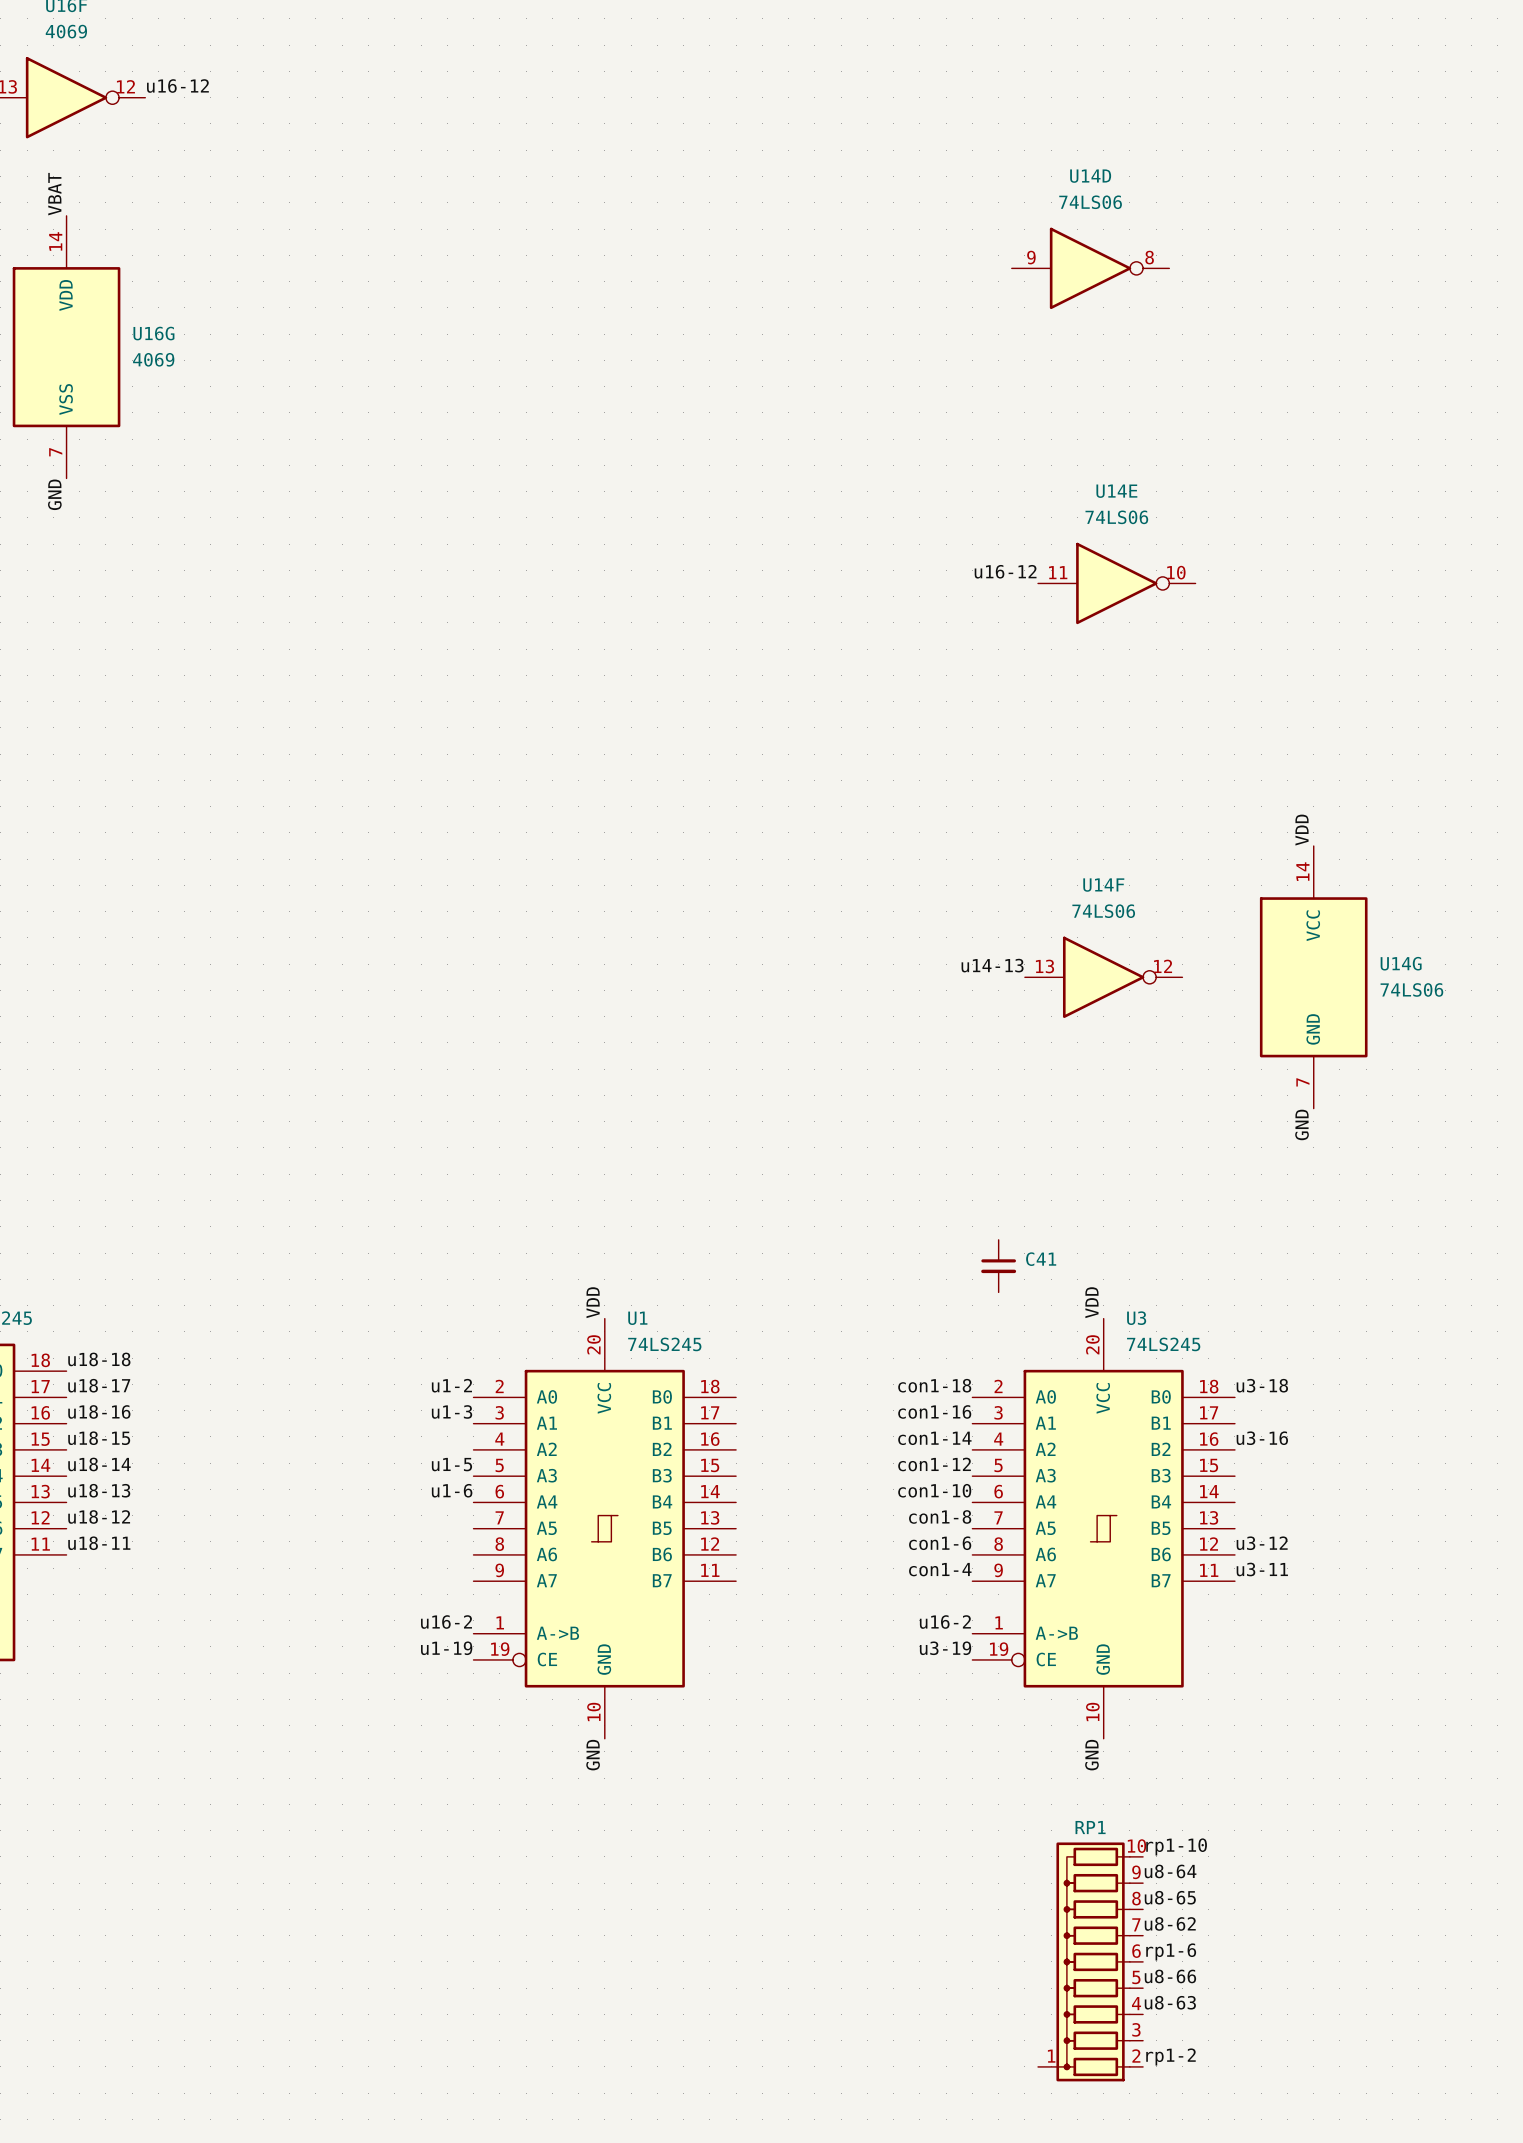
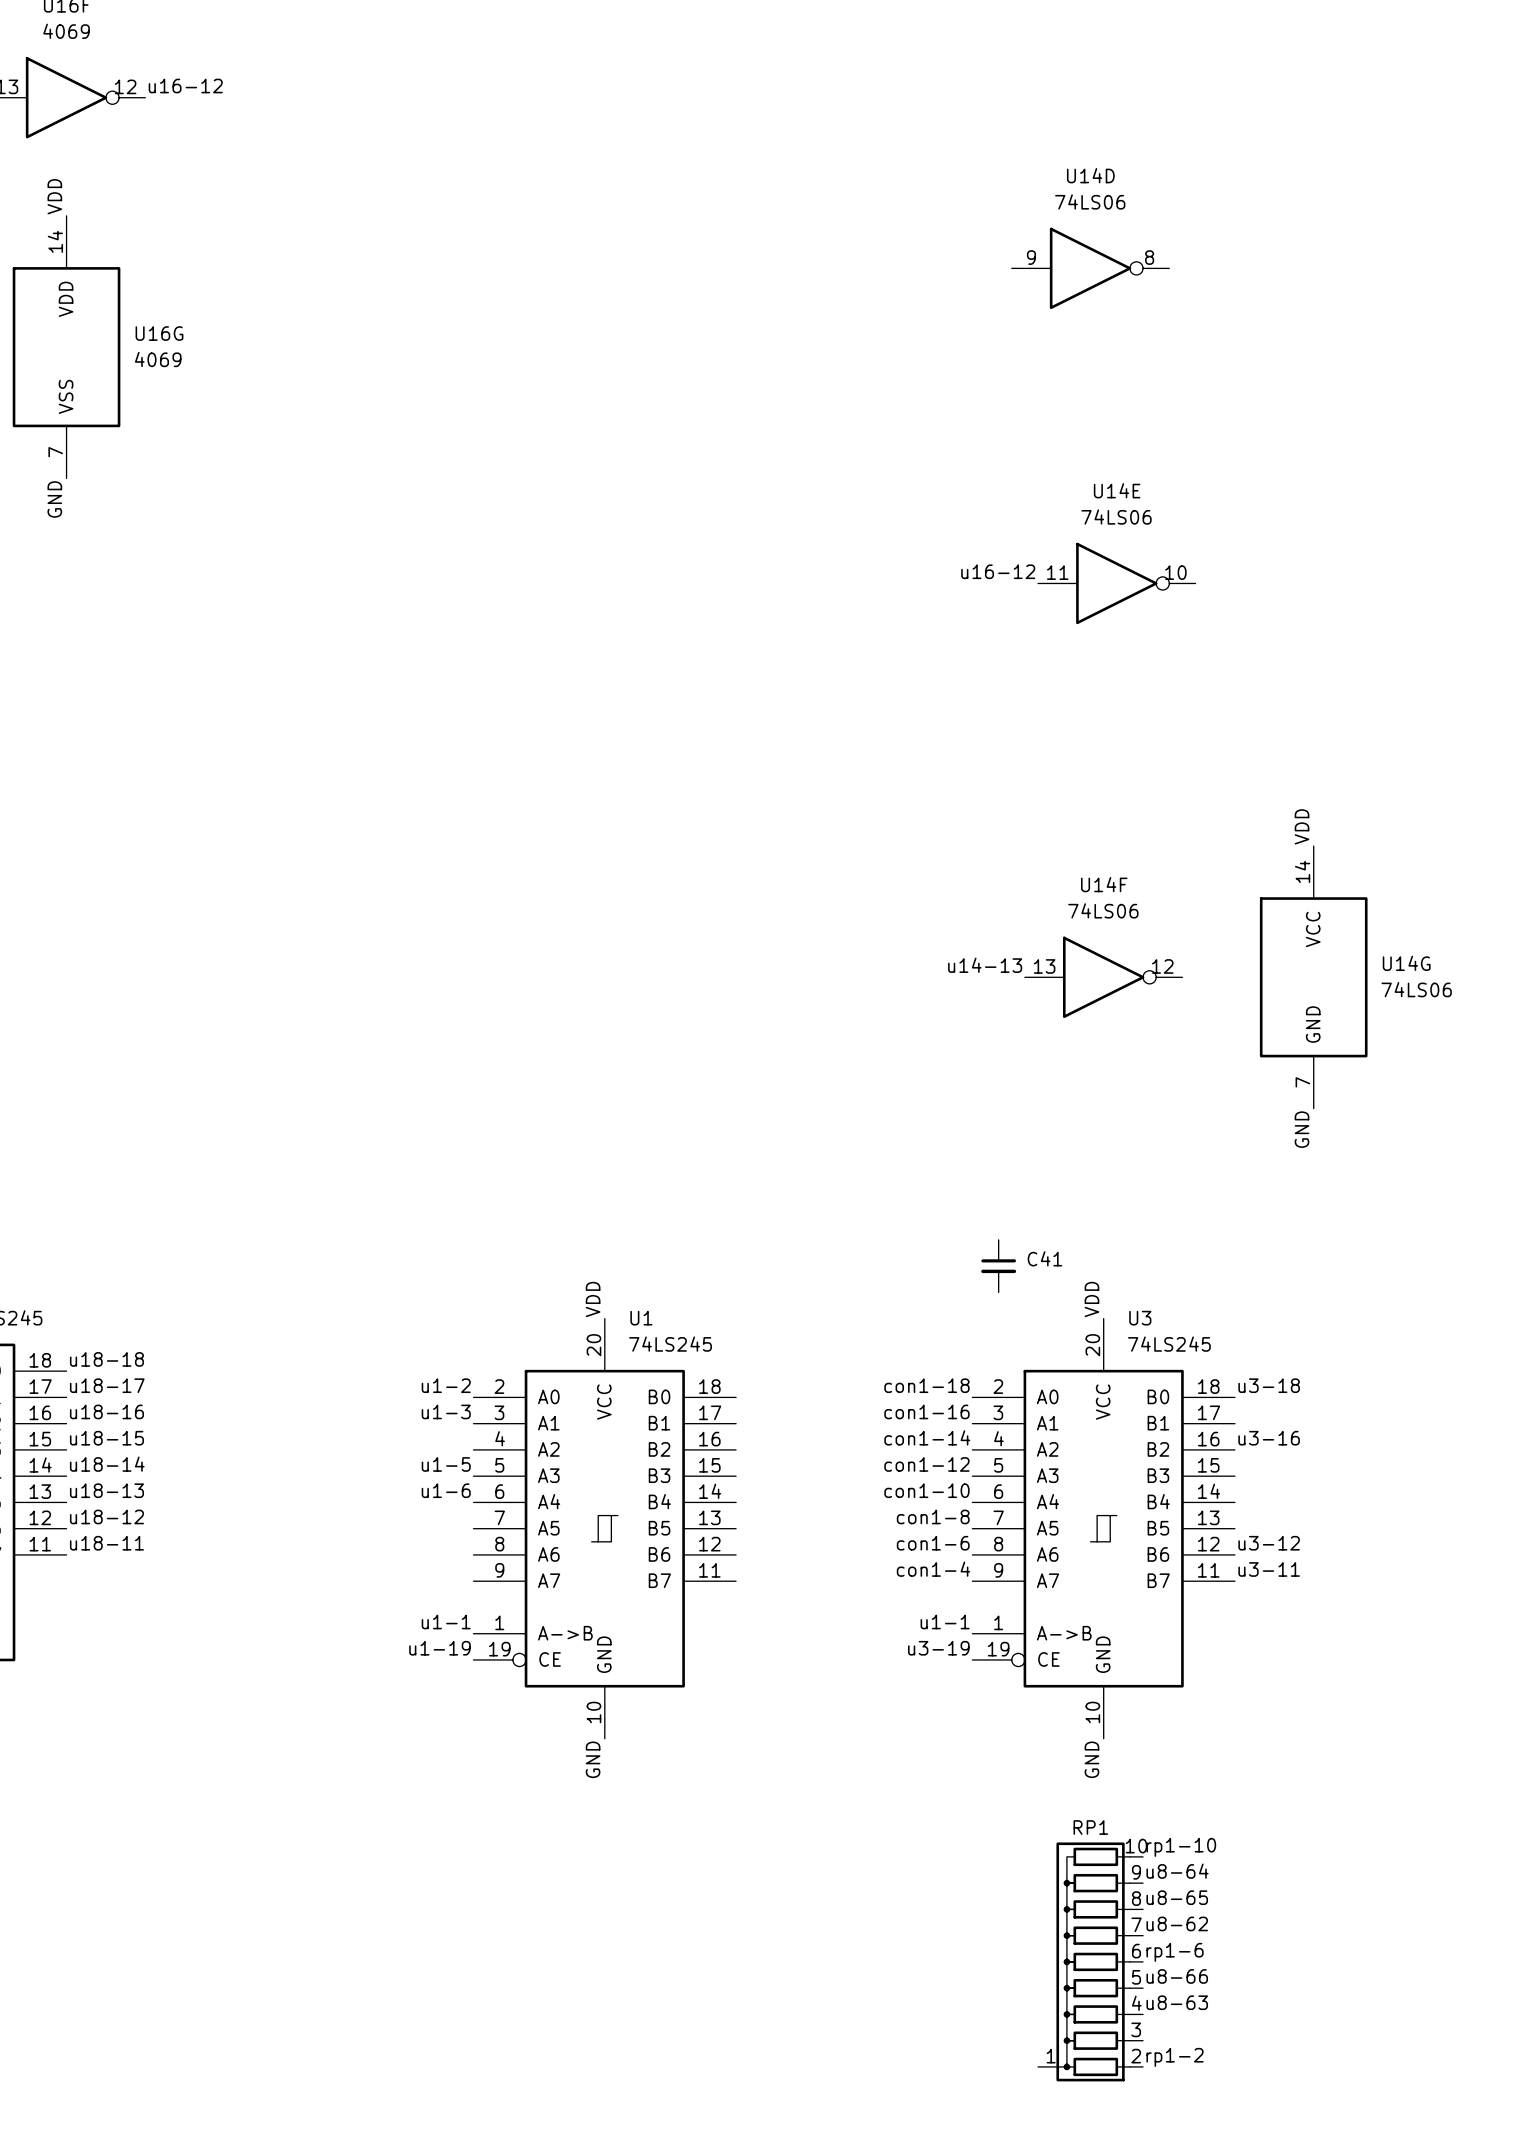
label: VBAT (54, 194) -> VDD (54, 196)
label: u16-2 (446, 1622) -> u1-1 (446, 1622)
label: u16-2 (945, 1622) -> u1-1 (945, 1622)

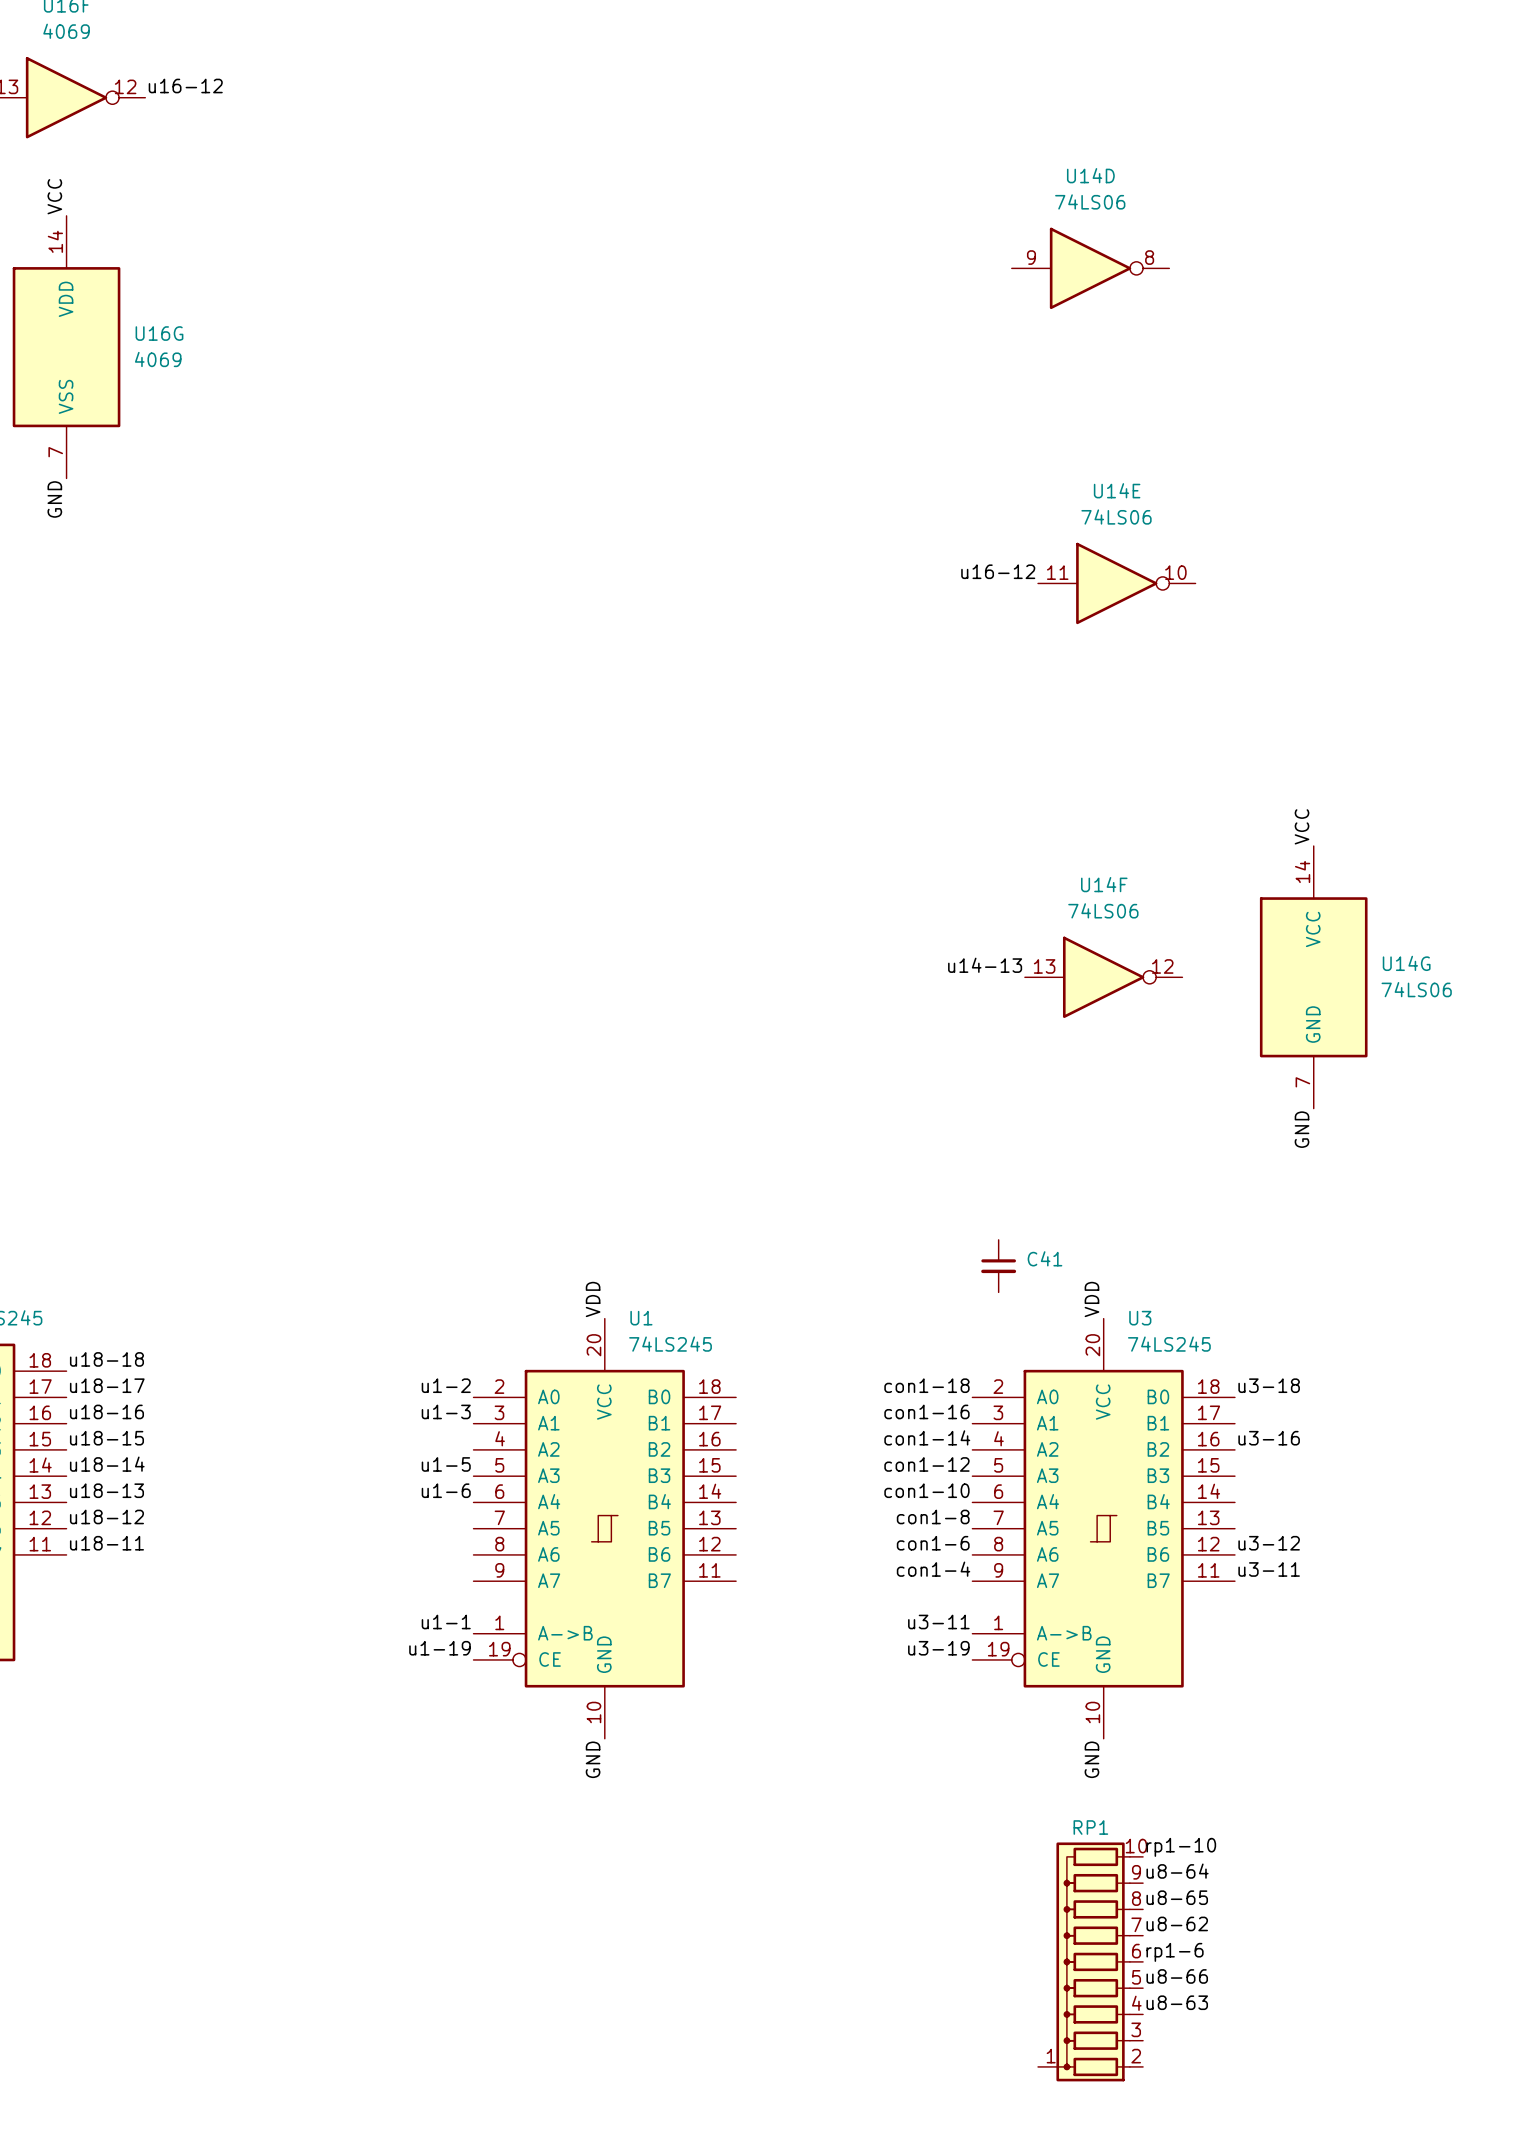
label: VDD (54, 196) -> VCC (54, 196)
label: VDD (1302, 826) -> VCC (1302, 826)
label: u1-1 (945, 1622) -> u3-11 (938, 1622)
label: rp1-2 (1175, 2057) -> none

